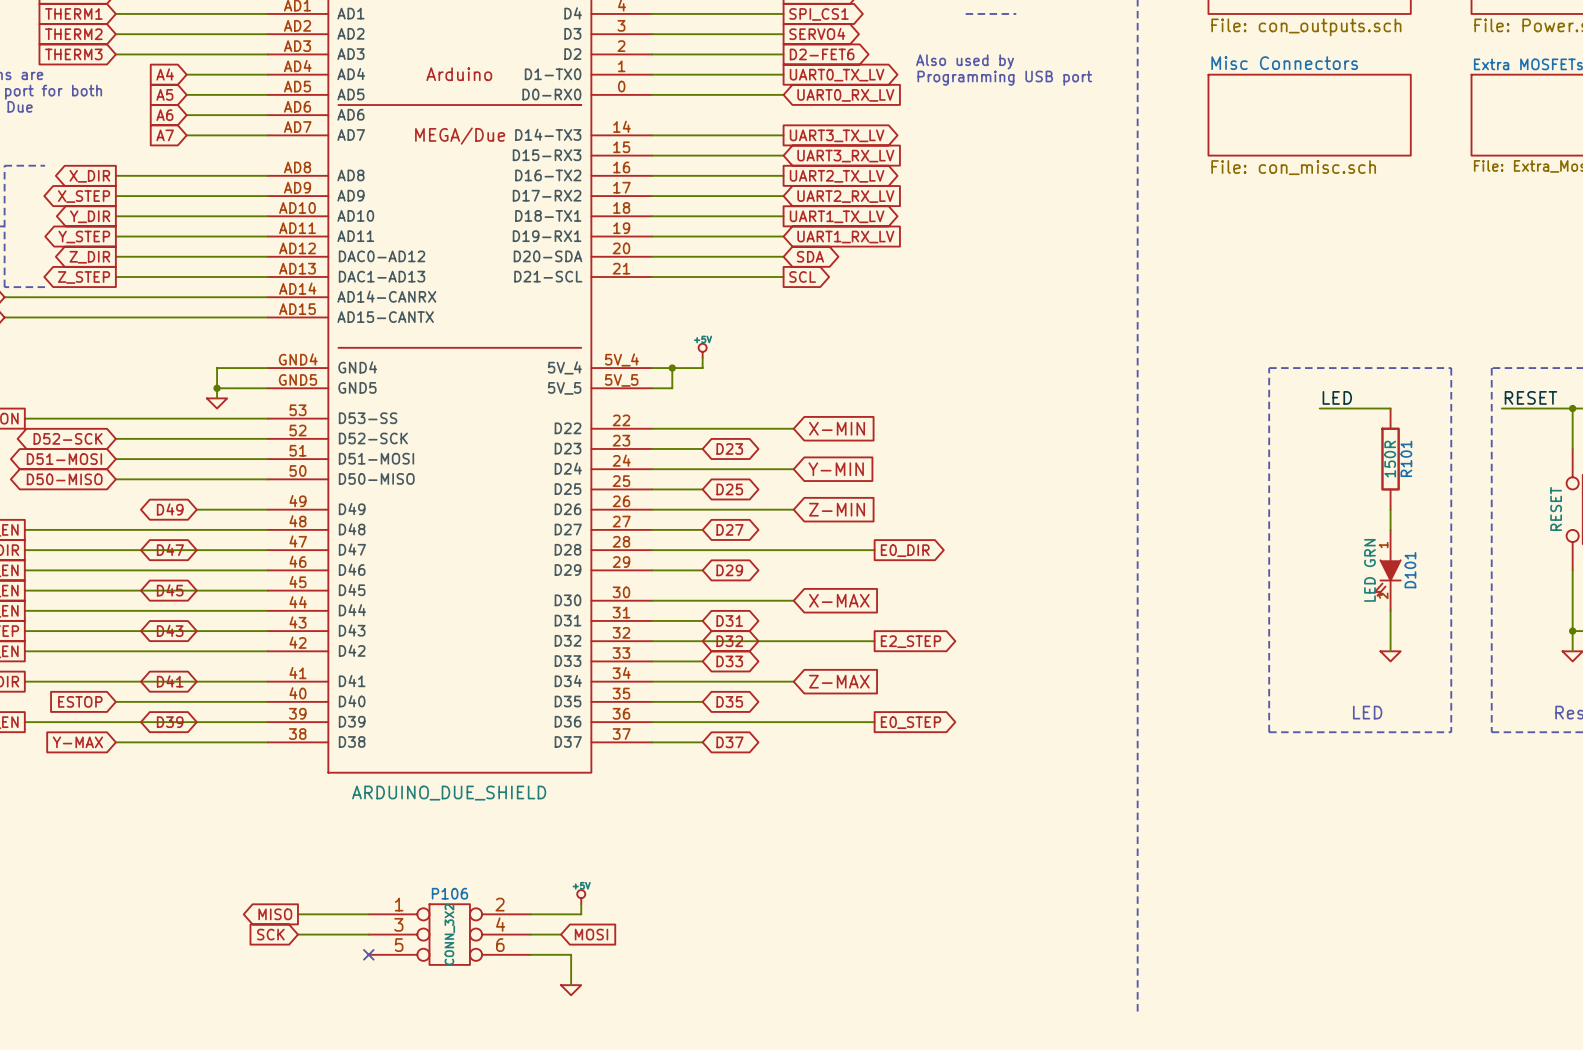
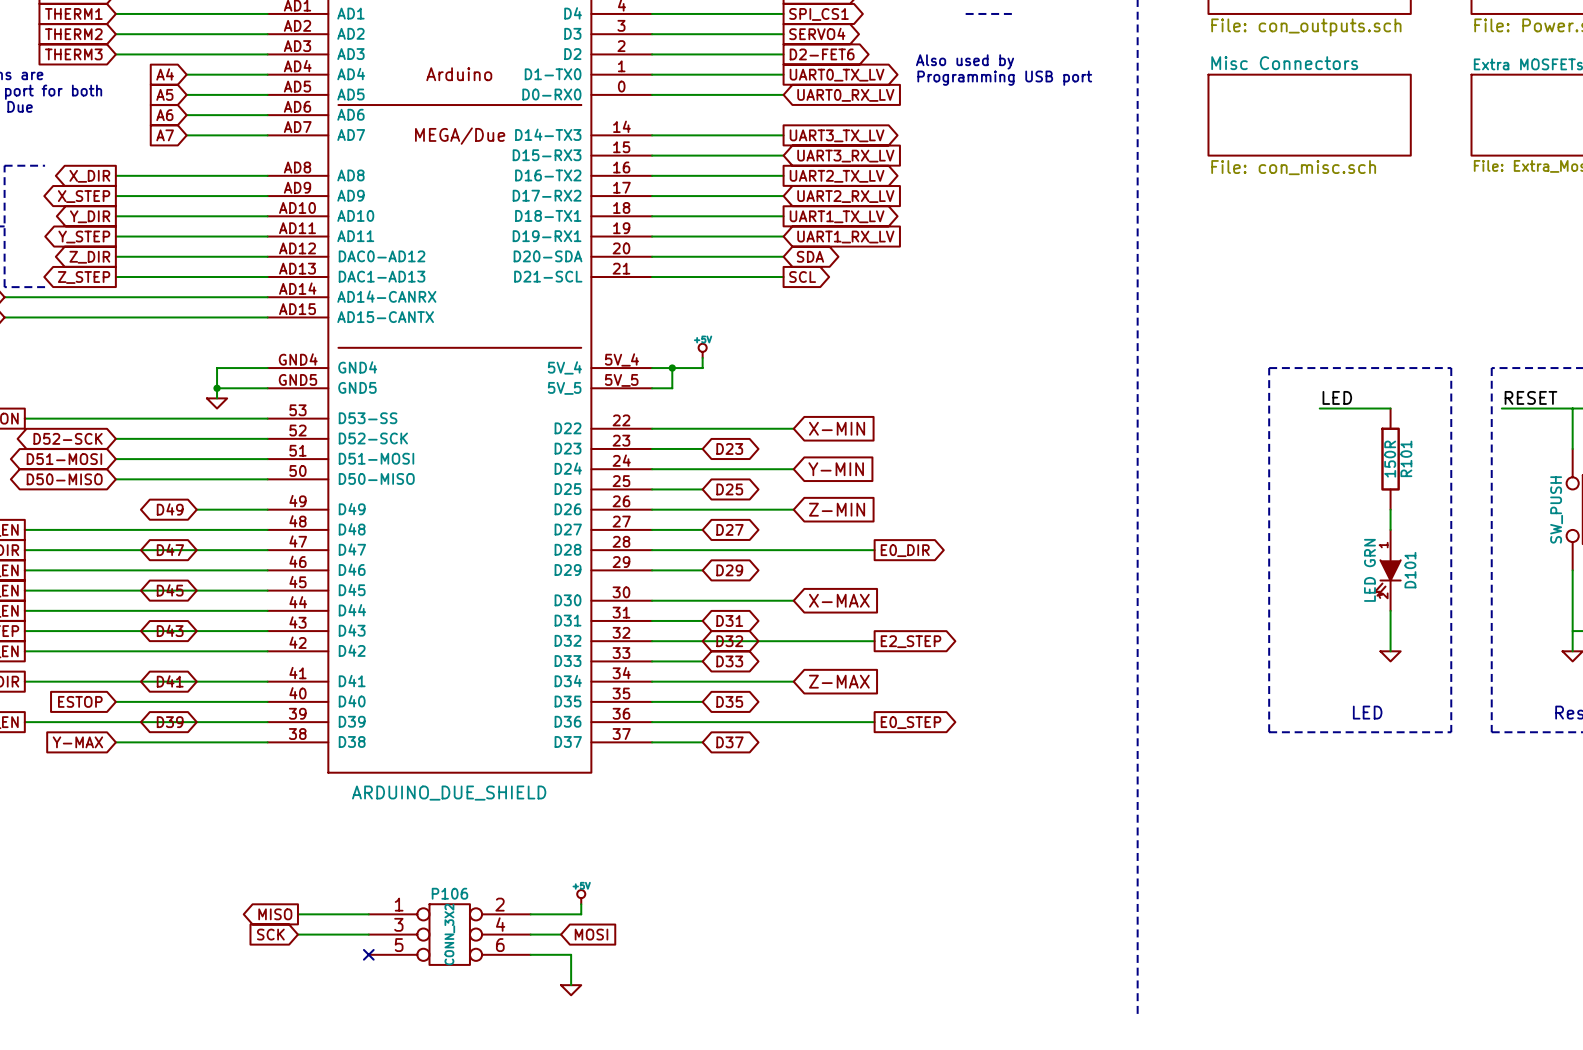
junction: (1572, 408) -> none
part value: RESET (1556, 508) -> SW_PUSH (1556, 509)
junction: (1572, 631) -> none

